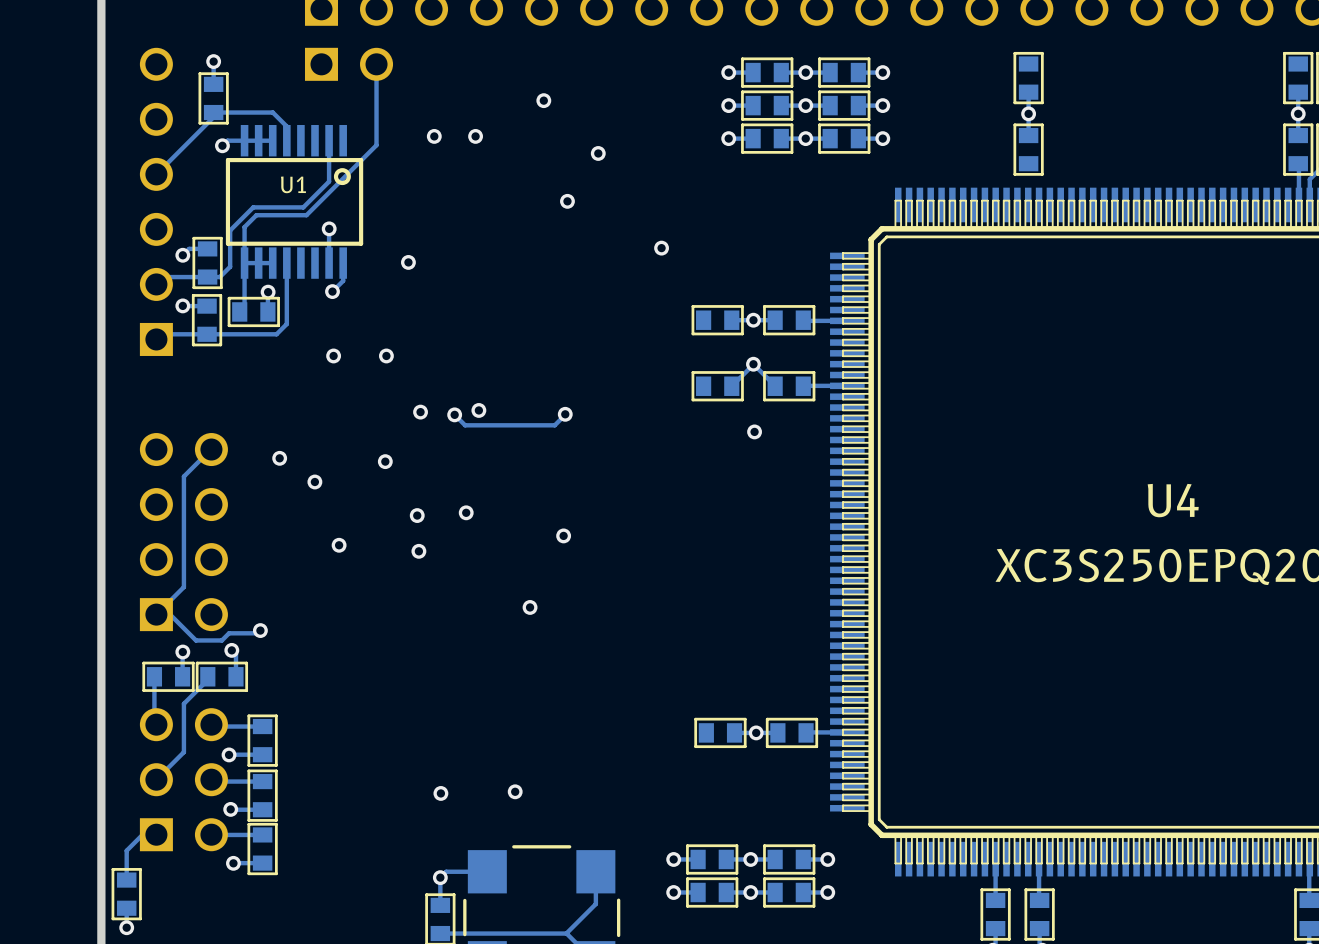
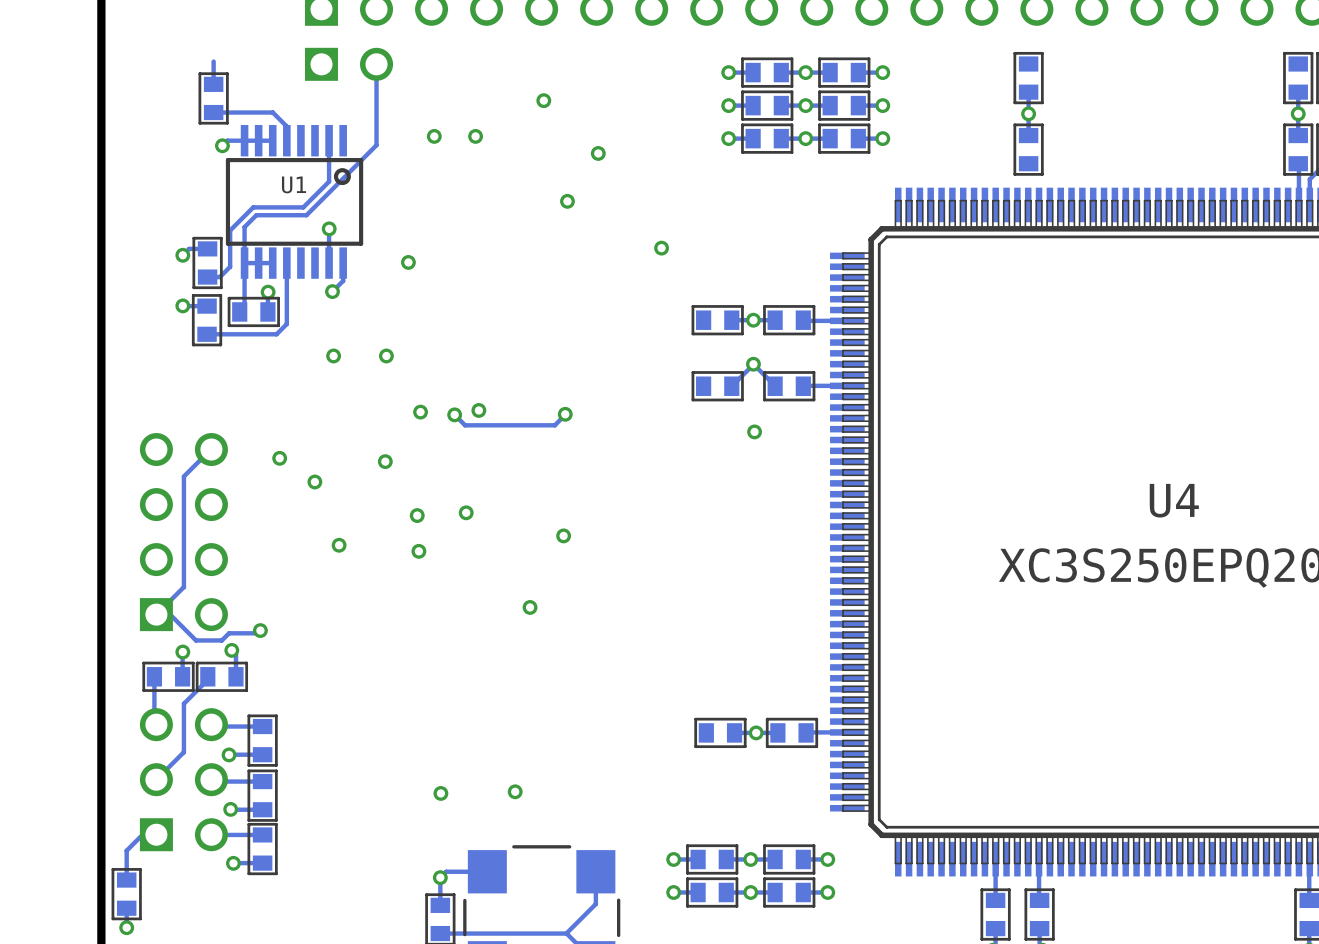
via: (213, 61) -> none
track: (213, 112) (213, 117) (156, 174) -> none
part: (156, 201) -> none
track: (207, 277) (163, 277) (156, 284) -> none
track: (207, 334) (161, 334) (156, 339) -> none

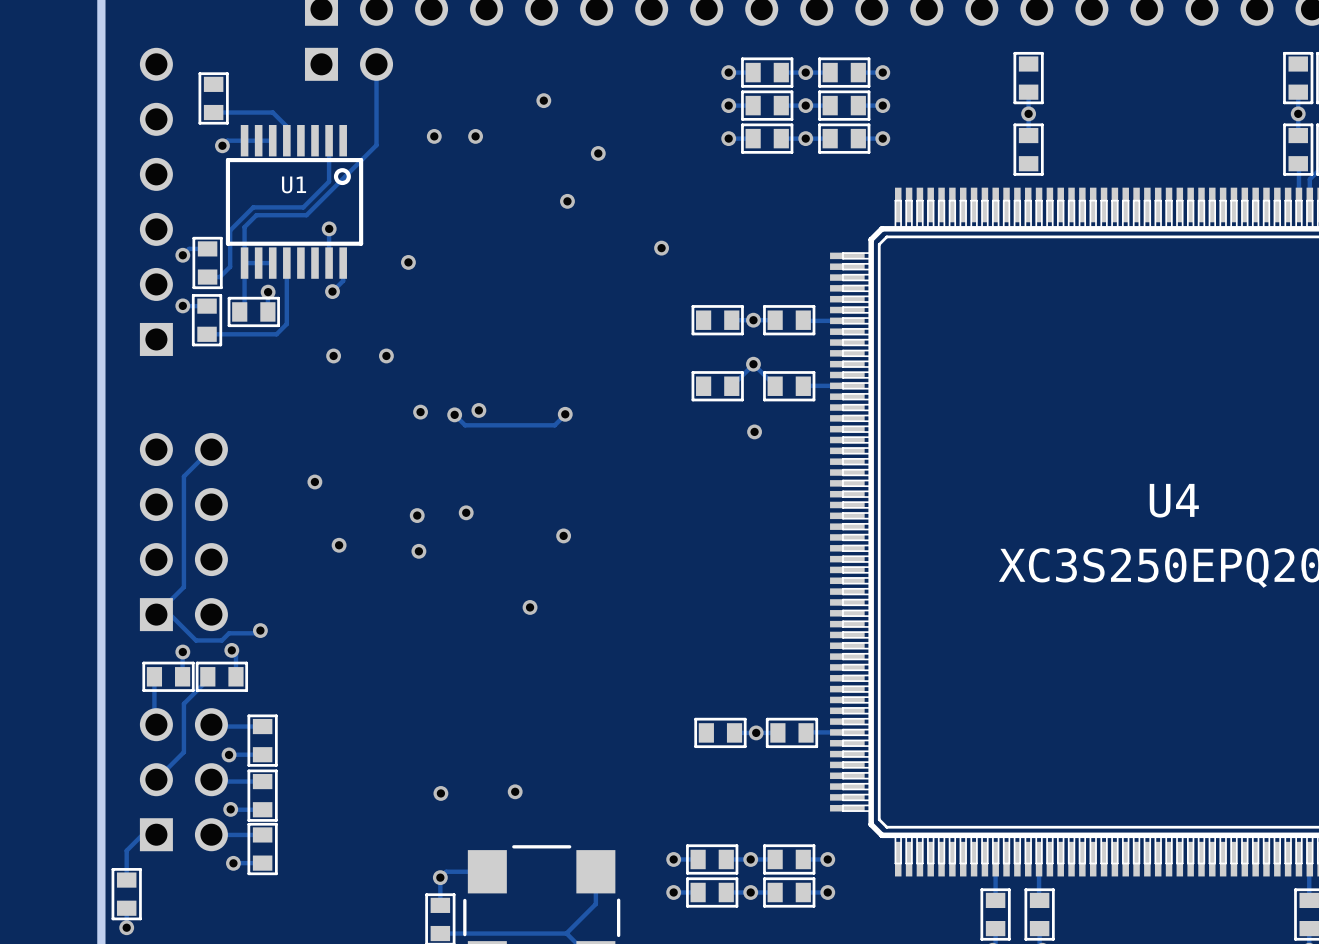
track: (213, 61) (213, 84) -> none
part: none -> (156, 201)
via: (279, 458) -> none
via: (385, 461) -> none

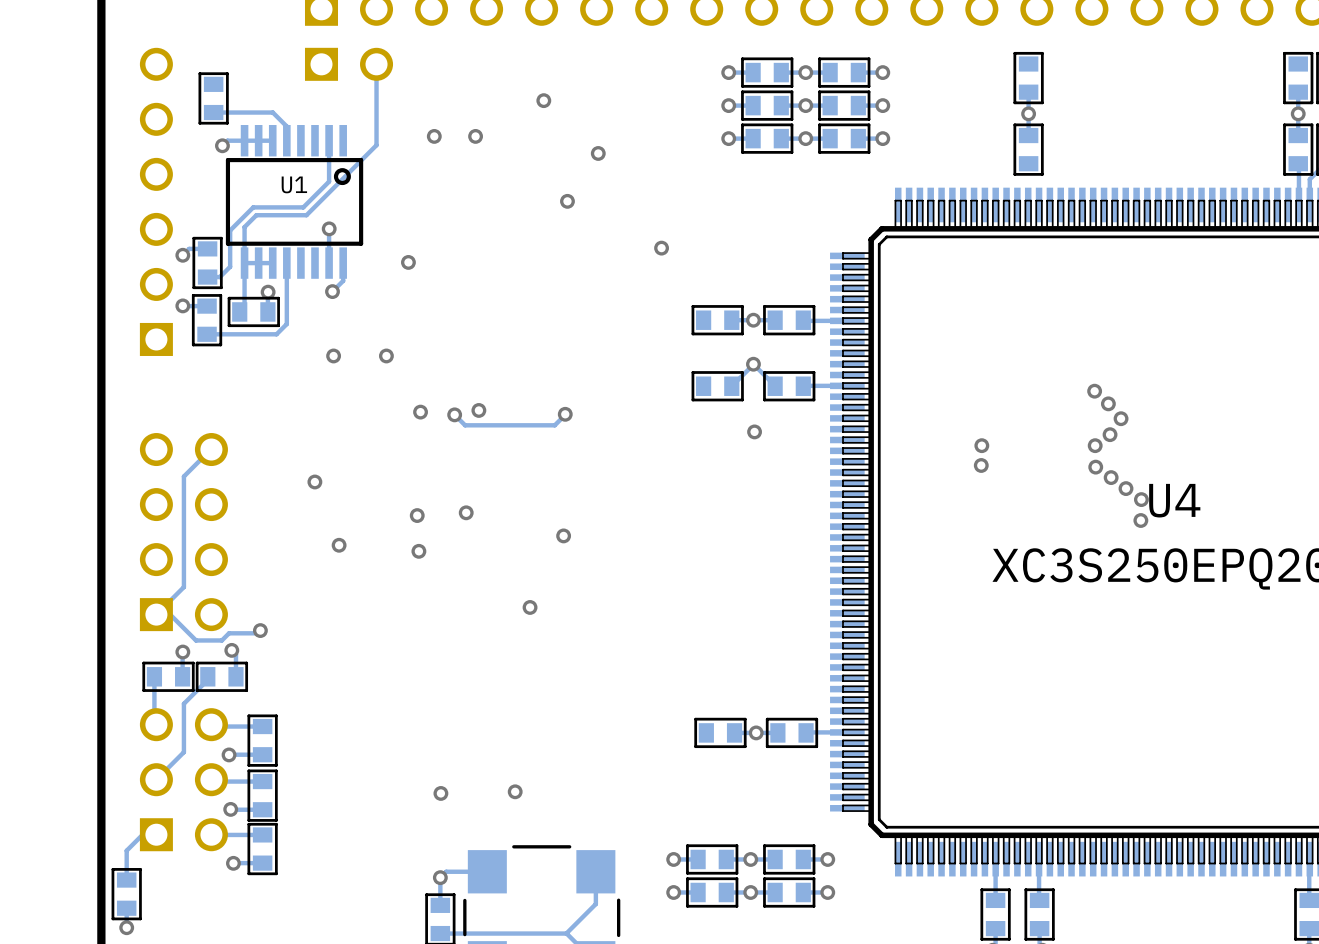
via: none -> (1094, 391)
via: none -> (1108, 403)
via: none -> (1121, 418)
via: none -> (1110, 434)
via: none -> (981, 445)
via: none -> (1095, 445)
via: none -> (981, 465)
via: none -> (1095, 467)
via: none -> (1111, 477)
via: none -> (1126, 488)
via: none -> (1141, 499)
via: none -> (1140, 520)

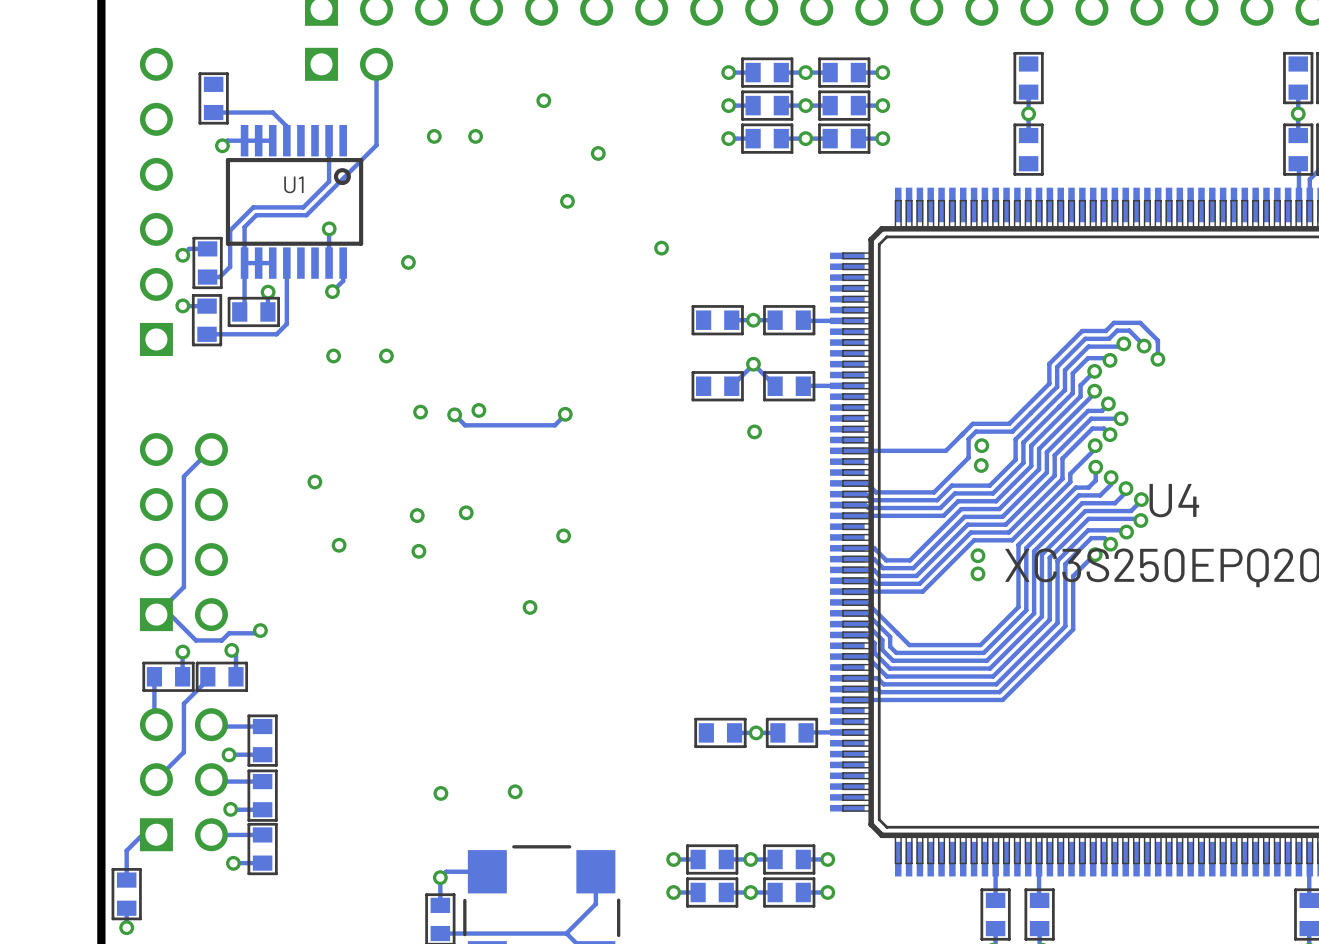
track: none -> (1123, 343) (1121, 346) (1088, 346) (1064, 370) (1064, 390) (1015, 439) (1015, 459) (989, 485) (951, 485) (937, 500) (871, 500) (865, 494) (847, 494)
via: none -> (1123, 343)
track: none -> (1144, 346) (1129, 330) (1117, 330) (1109, 338) (1085, 338) (1057, 367) (1057, 386) (1012, 431) (976, 431) (968, 439) (968, 457) (934, 492) (876, 492) (867, 483) (847, 483)
via: none -> (1144, 346)
track: none -> (1157, 359) (1157, 340) (1140, 322) (1114, 322) (1105, 330) (1082, 330) (1049, 363) (1049, 383) (1009, 423) (972, 423) (945, 450) (847, 450)
via: none -> (1157, 359)
track: none -> (1110, 360) (1107, 358) (1088, 358) (1072, 373) (1072, 393) (1023, 442) (1023, 462) (992, 493) (954, 493) (940, 508) (868, 508) (865, 504) (847, 504)
via: none -> (1110, 360)
track: none -> (1094, 371) (1080, 385) (1080, 396) (1031, 445) (1031, 466) (996, 501) (958, 501) (943, 515) (847, 515)
via: none -> (1094, 371)
track: none -> (1094, 391) (1094, 393) (1039, 448) (1039, 469) (999, 509) (961, 509) (910, 560) (886, 560) (874, 548) (847, 548)
track: none -> (1108, 403) (1102, 410) (1088, 410) (1046, 452) (1046, 472) (1002, 516) (964, 516) (913, 568) (883, 568) (874, 559) (847, 559)
track: none -> (1121, 418) (1091, 418) (1054, 455) (1054, 475) (1005, 524) (967, 524) (916, 575) (879, 575) (873, 569) (847, 569)
track: none -> (1110, 434) (1103, 428) (1092, 428) (1062, 458) (1062, 478) (1008, 532) (970, 532) (919, 583) (876, 583) (873, 580) (847, 580)
track: none -> (1095, 445) (1095, 448) (1070, 473) (1070, 482) (1012, 540) (974, 540) (922, 591) (847, 591)
track: none -> (1095, 467) (1095, 480) (1088, 487) (1075, 487) (1018, 544) (1018, 607) (980, 645) (909, 645) (866, 602) (847, 602)
track: none -> (1111, 477) (1111, 484) (1100, 495) (1079, 495) (1026, 548) (1026, 610) (983, 652) (896, 652) (890, 646) (890, 636) (866, 613) (847, 613)
track: none -> (1126, 488) (1126, 492) (1115, 503) (1082, 503) (1034, 551) (1034, 613) (986, 660) (893, 660) (882, 649) (882, 640) (866, 624) (847, 624)
track: none -> (1141, 499) (1131, 511) (1085, 511) (1041, 554) (1041, 616) (990, 668) (889, 668) (874, 653) (874, 643) (866, 634) (847, 634)
track: none -> (1140, 520) (1139, 518) (1088, 518) (1049, 557) (1049, 619) (993, 676) (886, 676) (866, 656) (847, 656)
track: none -> (1126, 532) (1124, 530) (1088, 530) (1057, 560) (1057, 623) (996, 684) (883, 684) (877, 678) (847, 678)
via: none -> (1126, 532)
track: none -> (1110, 544) (1104, 538) (1091, 538) (1065, 564) (1065, 626) (999, 692) (880, 692) (877, 689) (847, 689)
via: none -> (1110, 544)
track: none -> (1095, 554) (1073, 576) (1073, 629) (1002, 699) (847, 699)
via: none -> (1095, 554)
via: none -> (977, 555)
via: none -> (977, 573)

